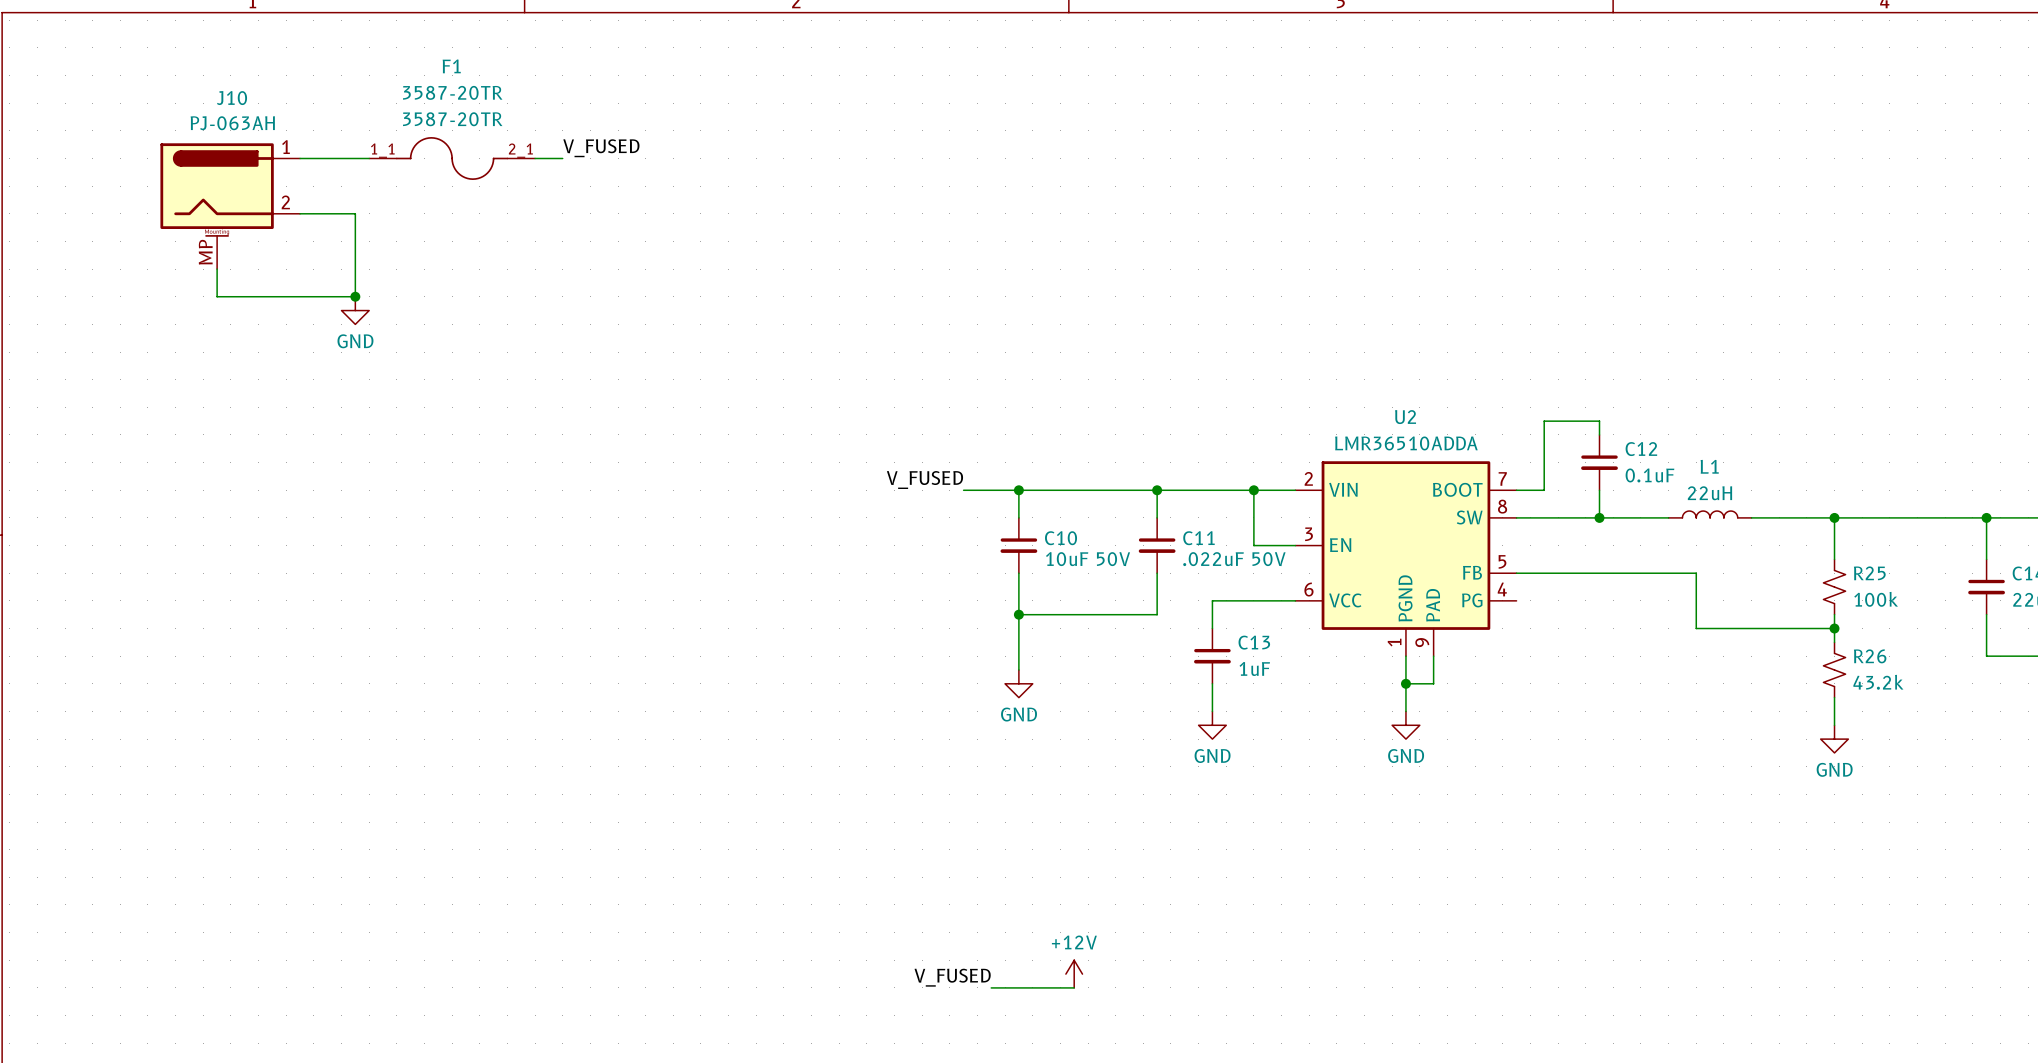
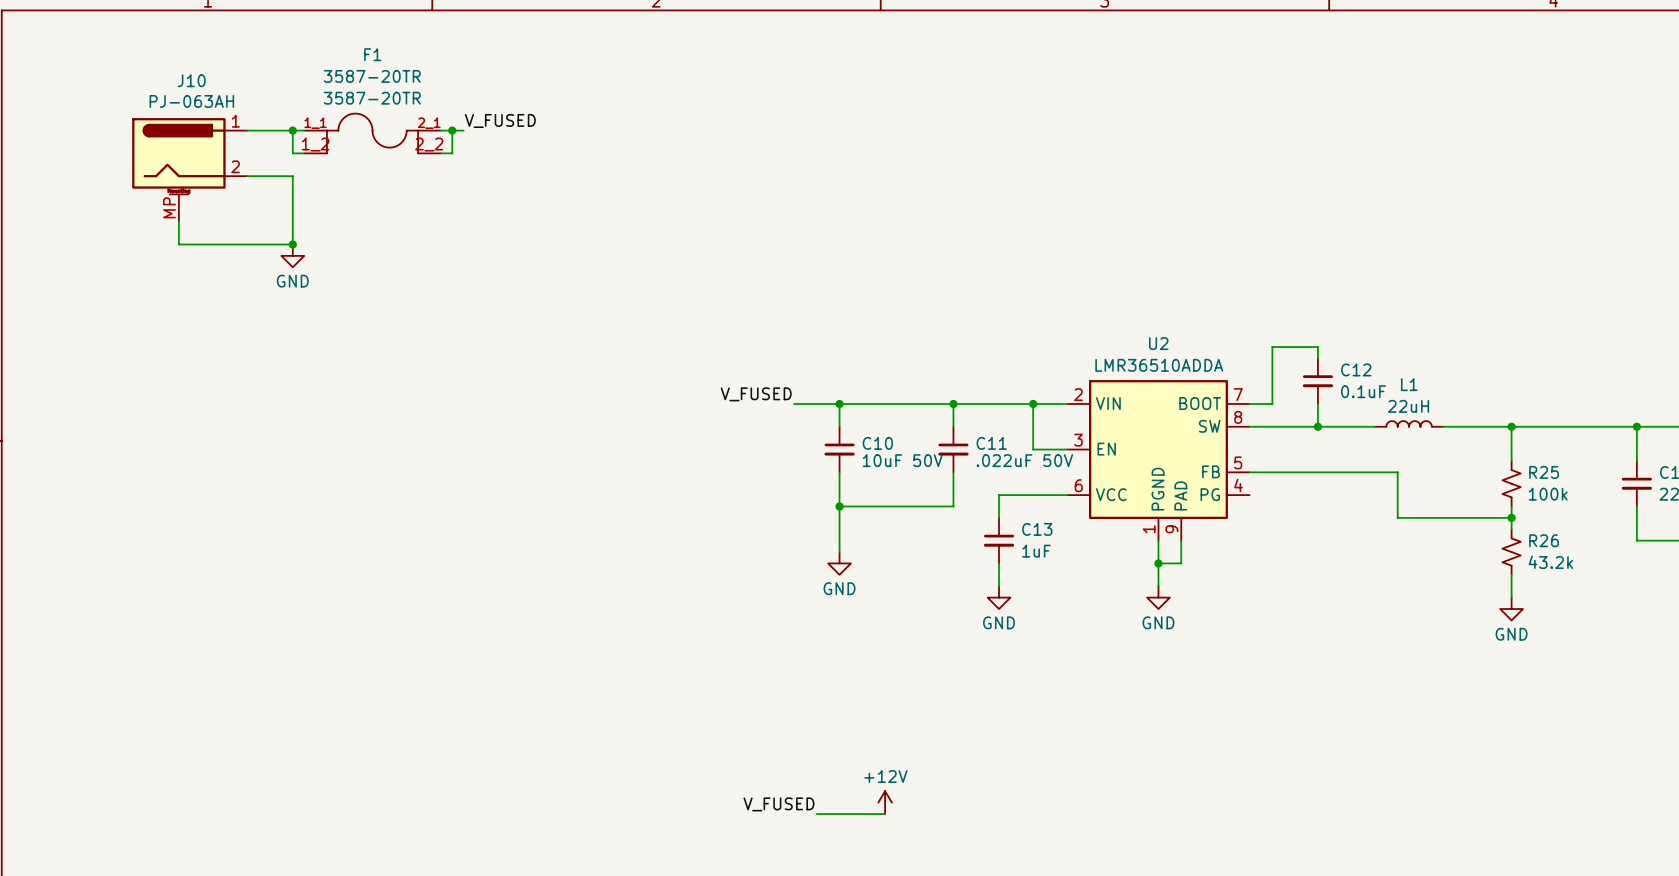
F1 symbol: [369, 137, 536, 180] -> [304, 112, 441, 154]
wire: none -> (292, 130) (292, 153) (304, 153)
junction: none -> (292, 130)
wire: none -> (452, 130) (452, 153) (440, 153)
junction: none -> (452, 130)

